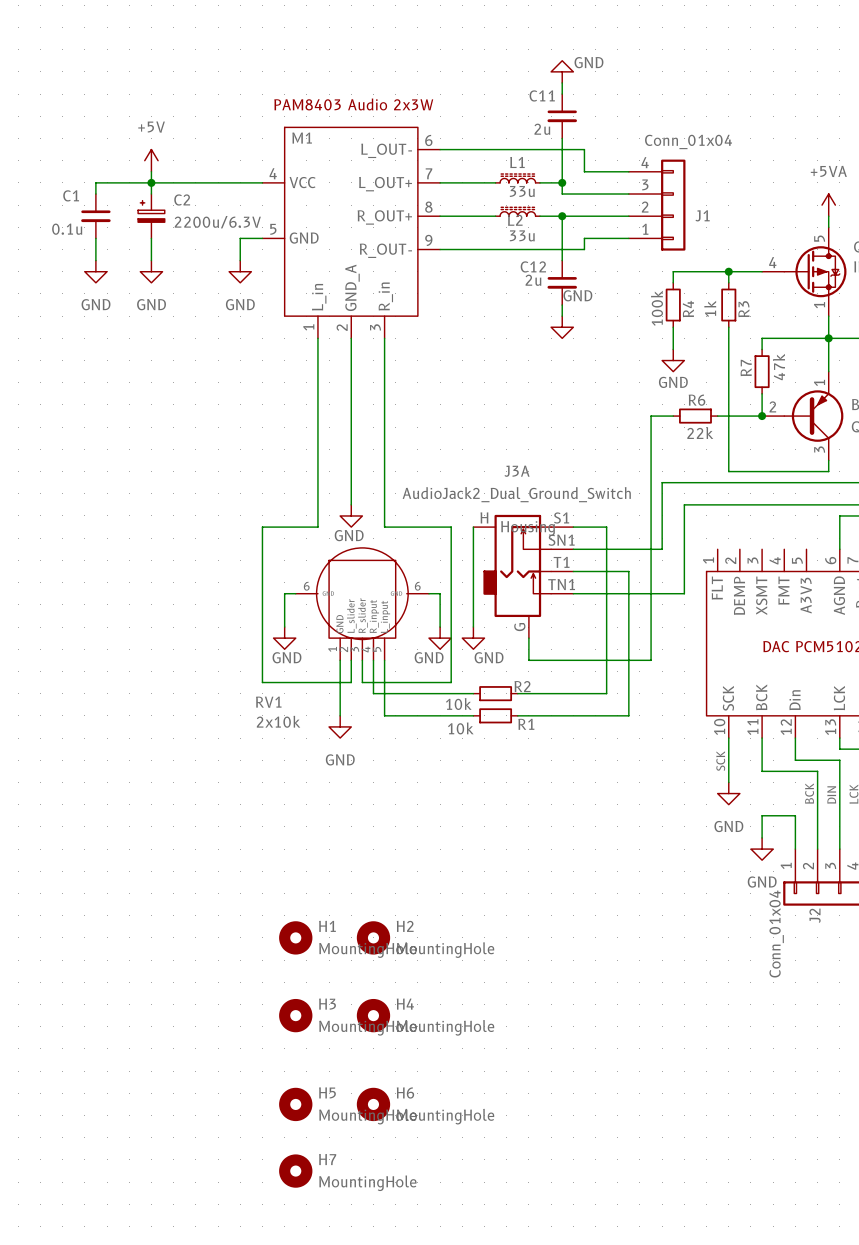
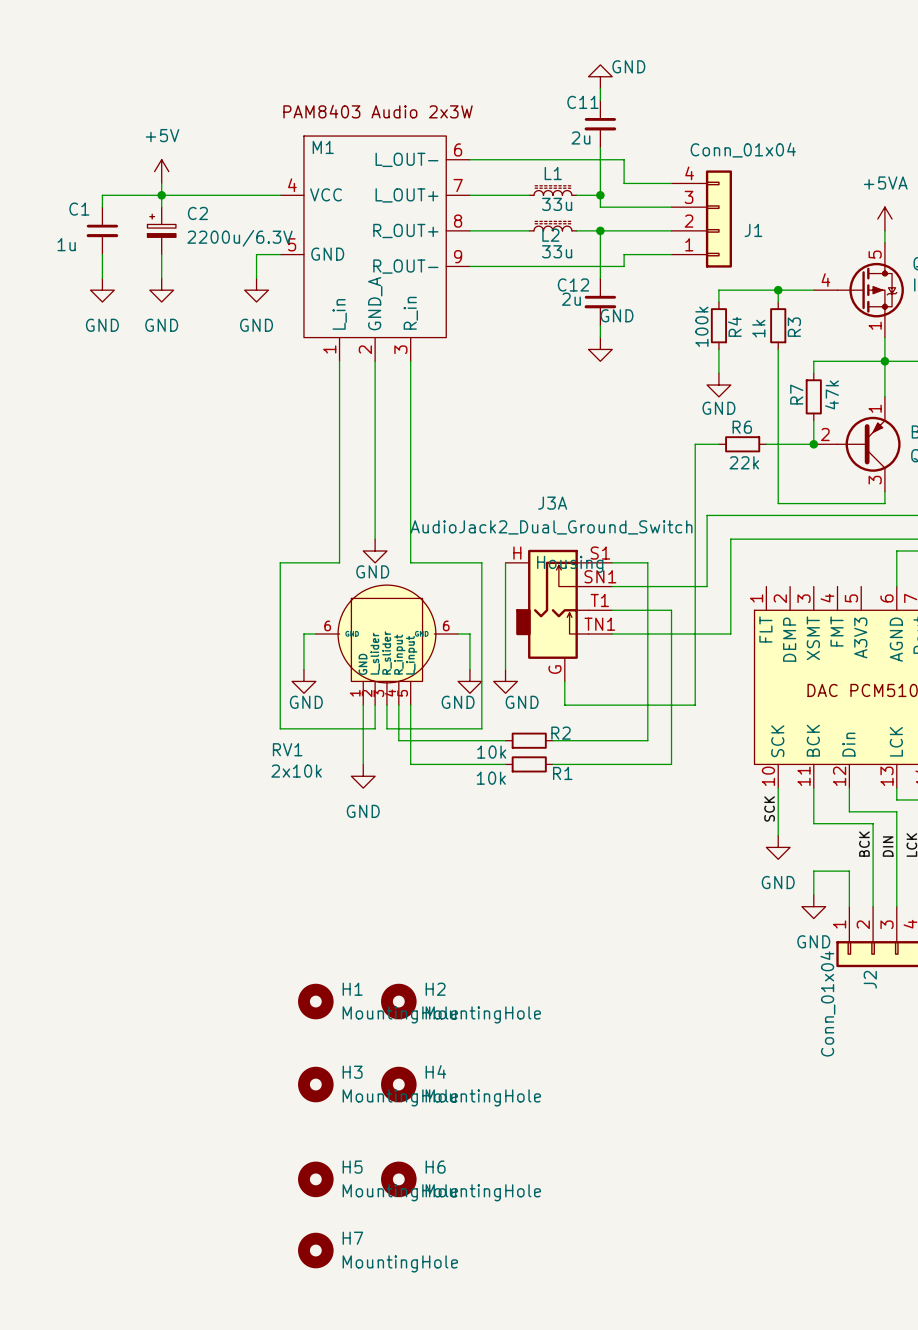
C1 value: 0.1u (67, 229) -> 1u (66, 244)

